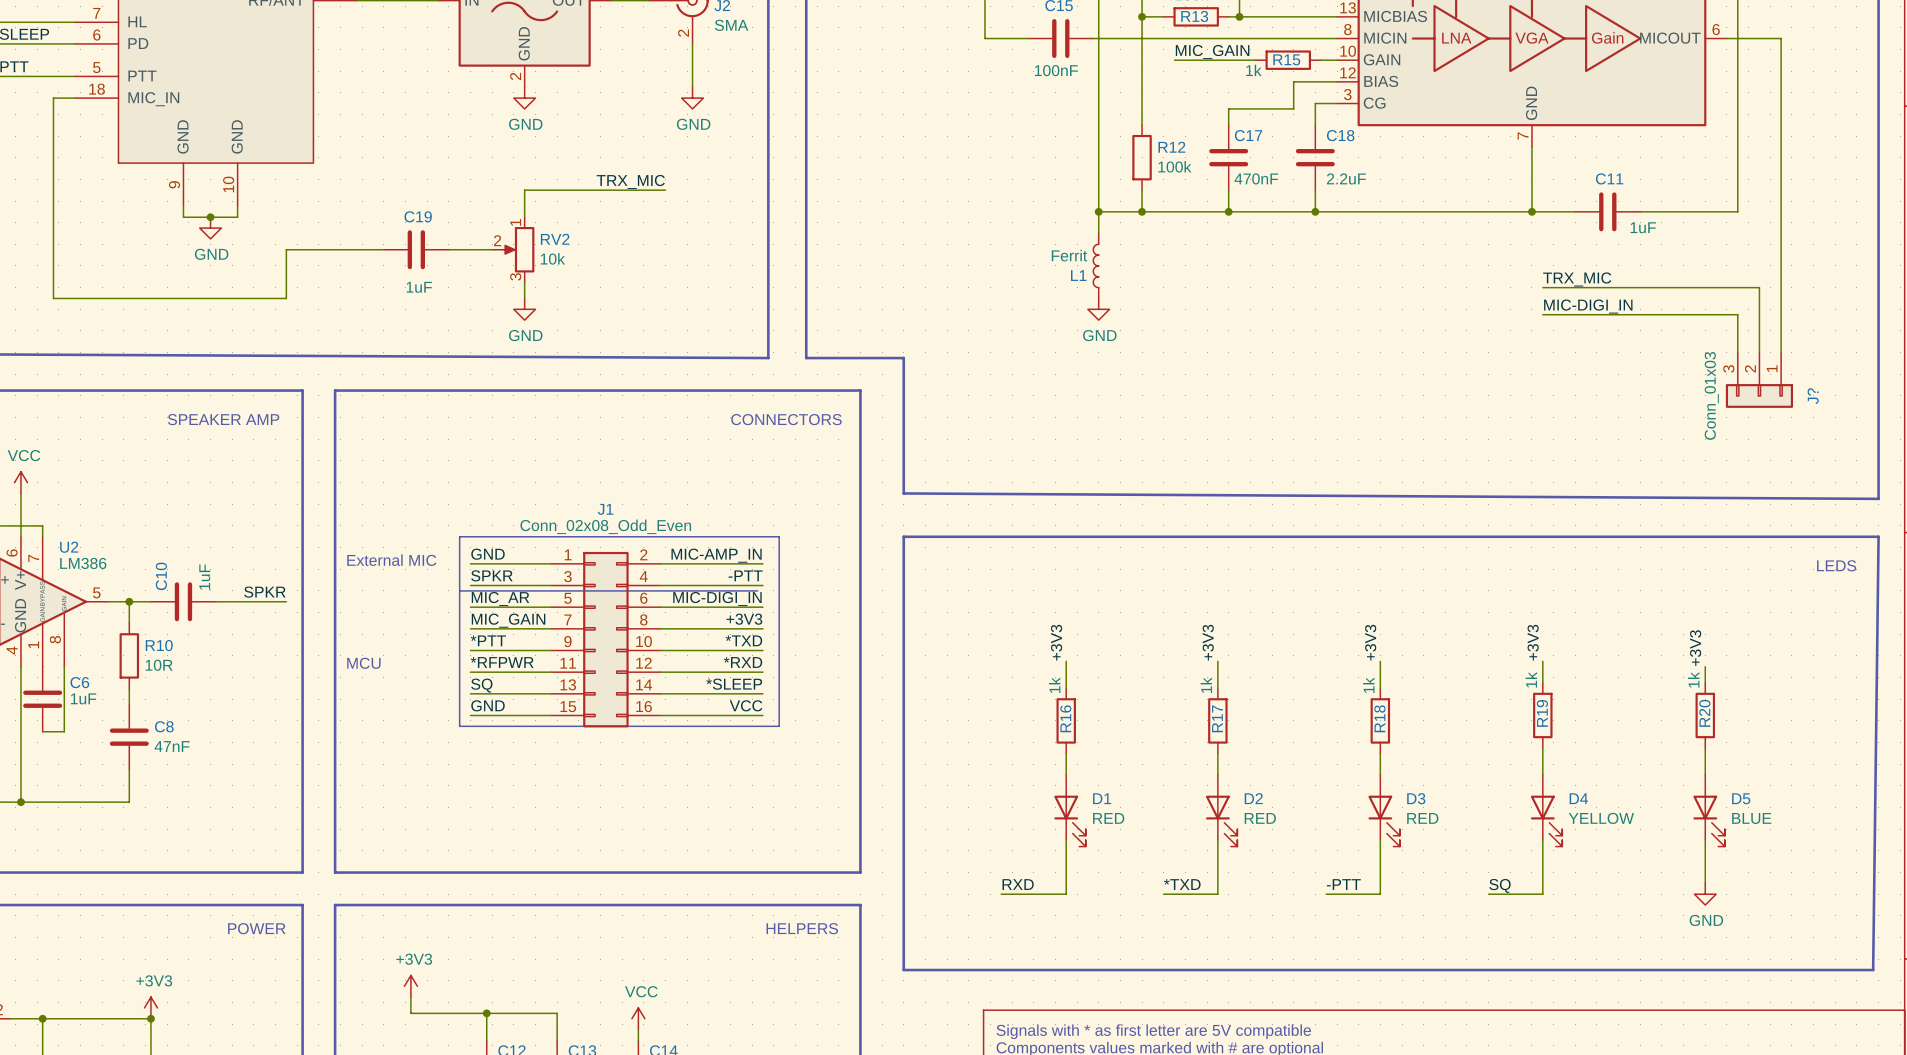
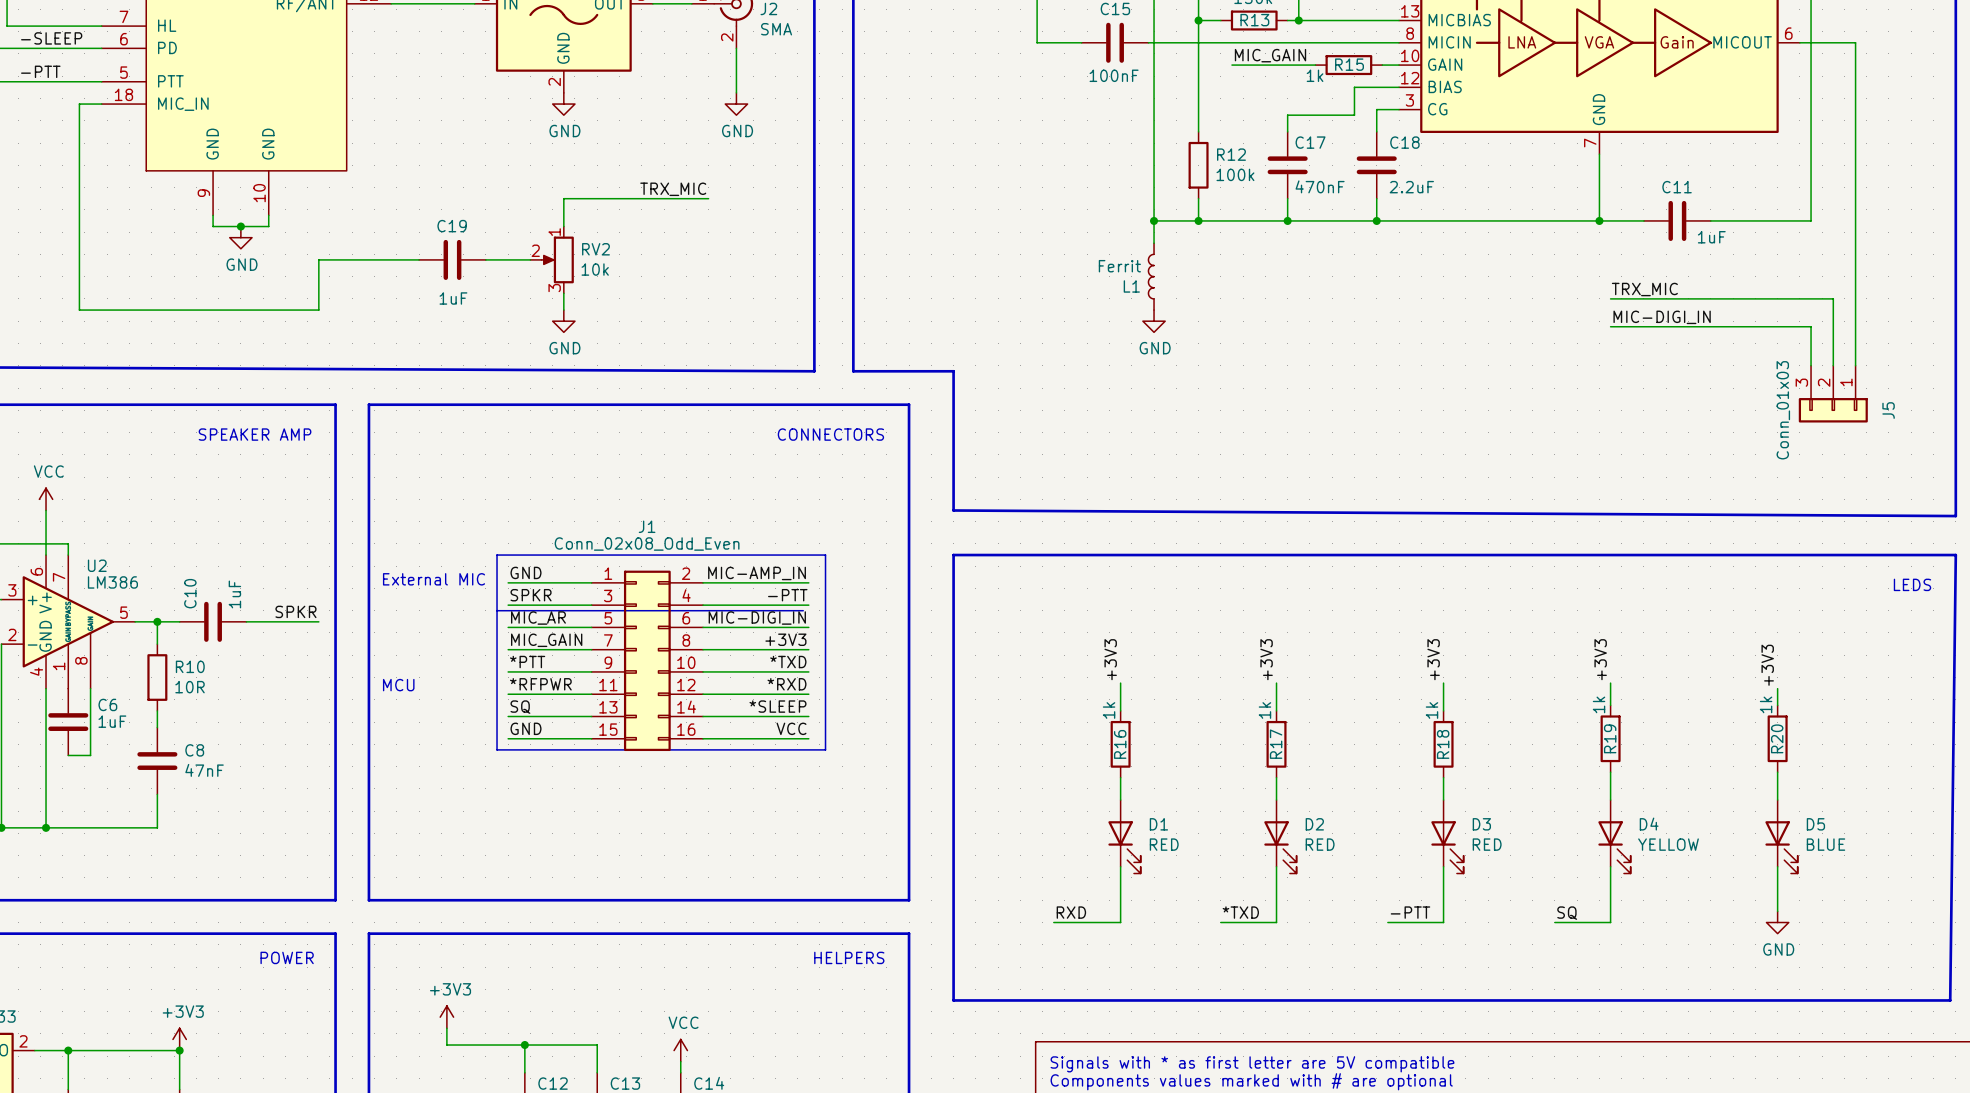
J? name: J? (1813, 396) -> J5 (1888, 410)

